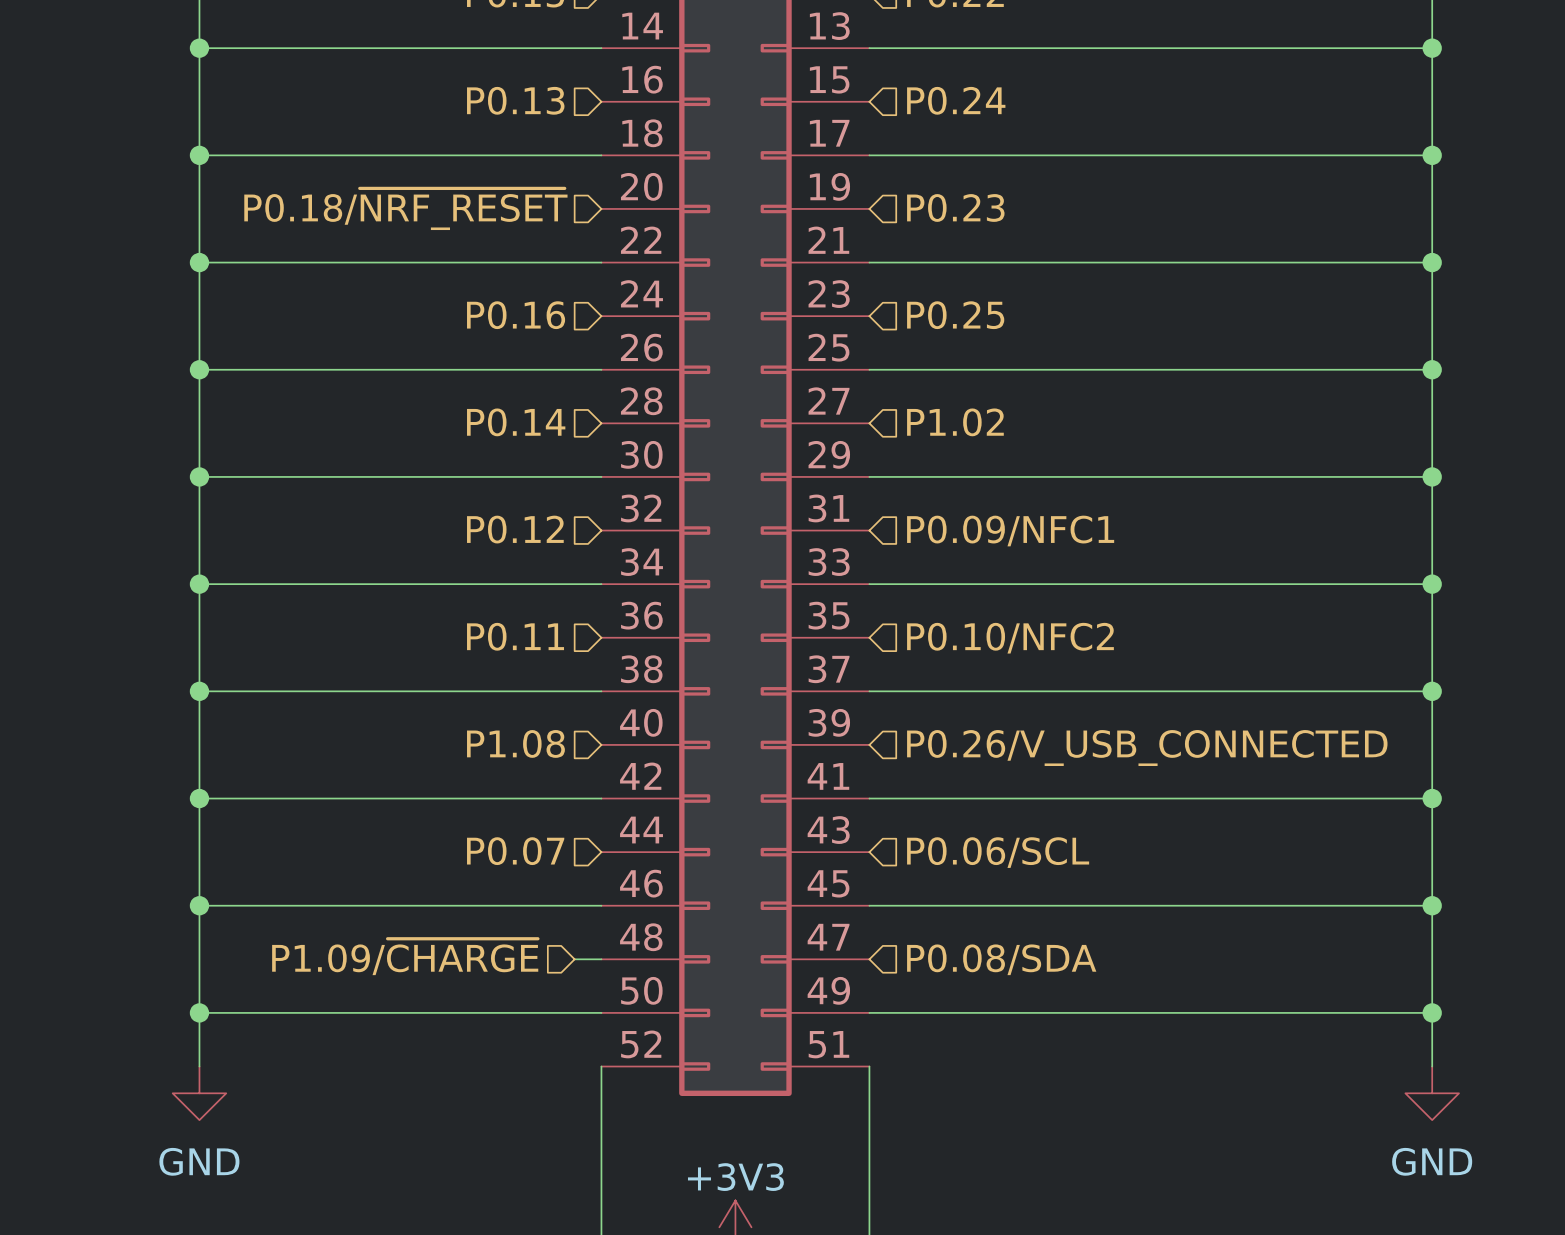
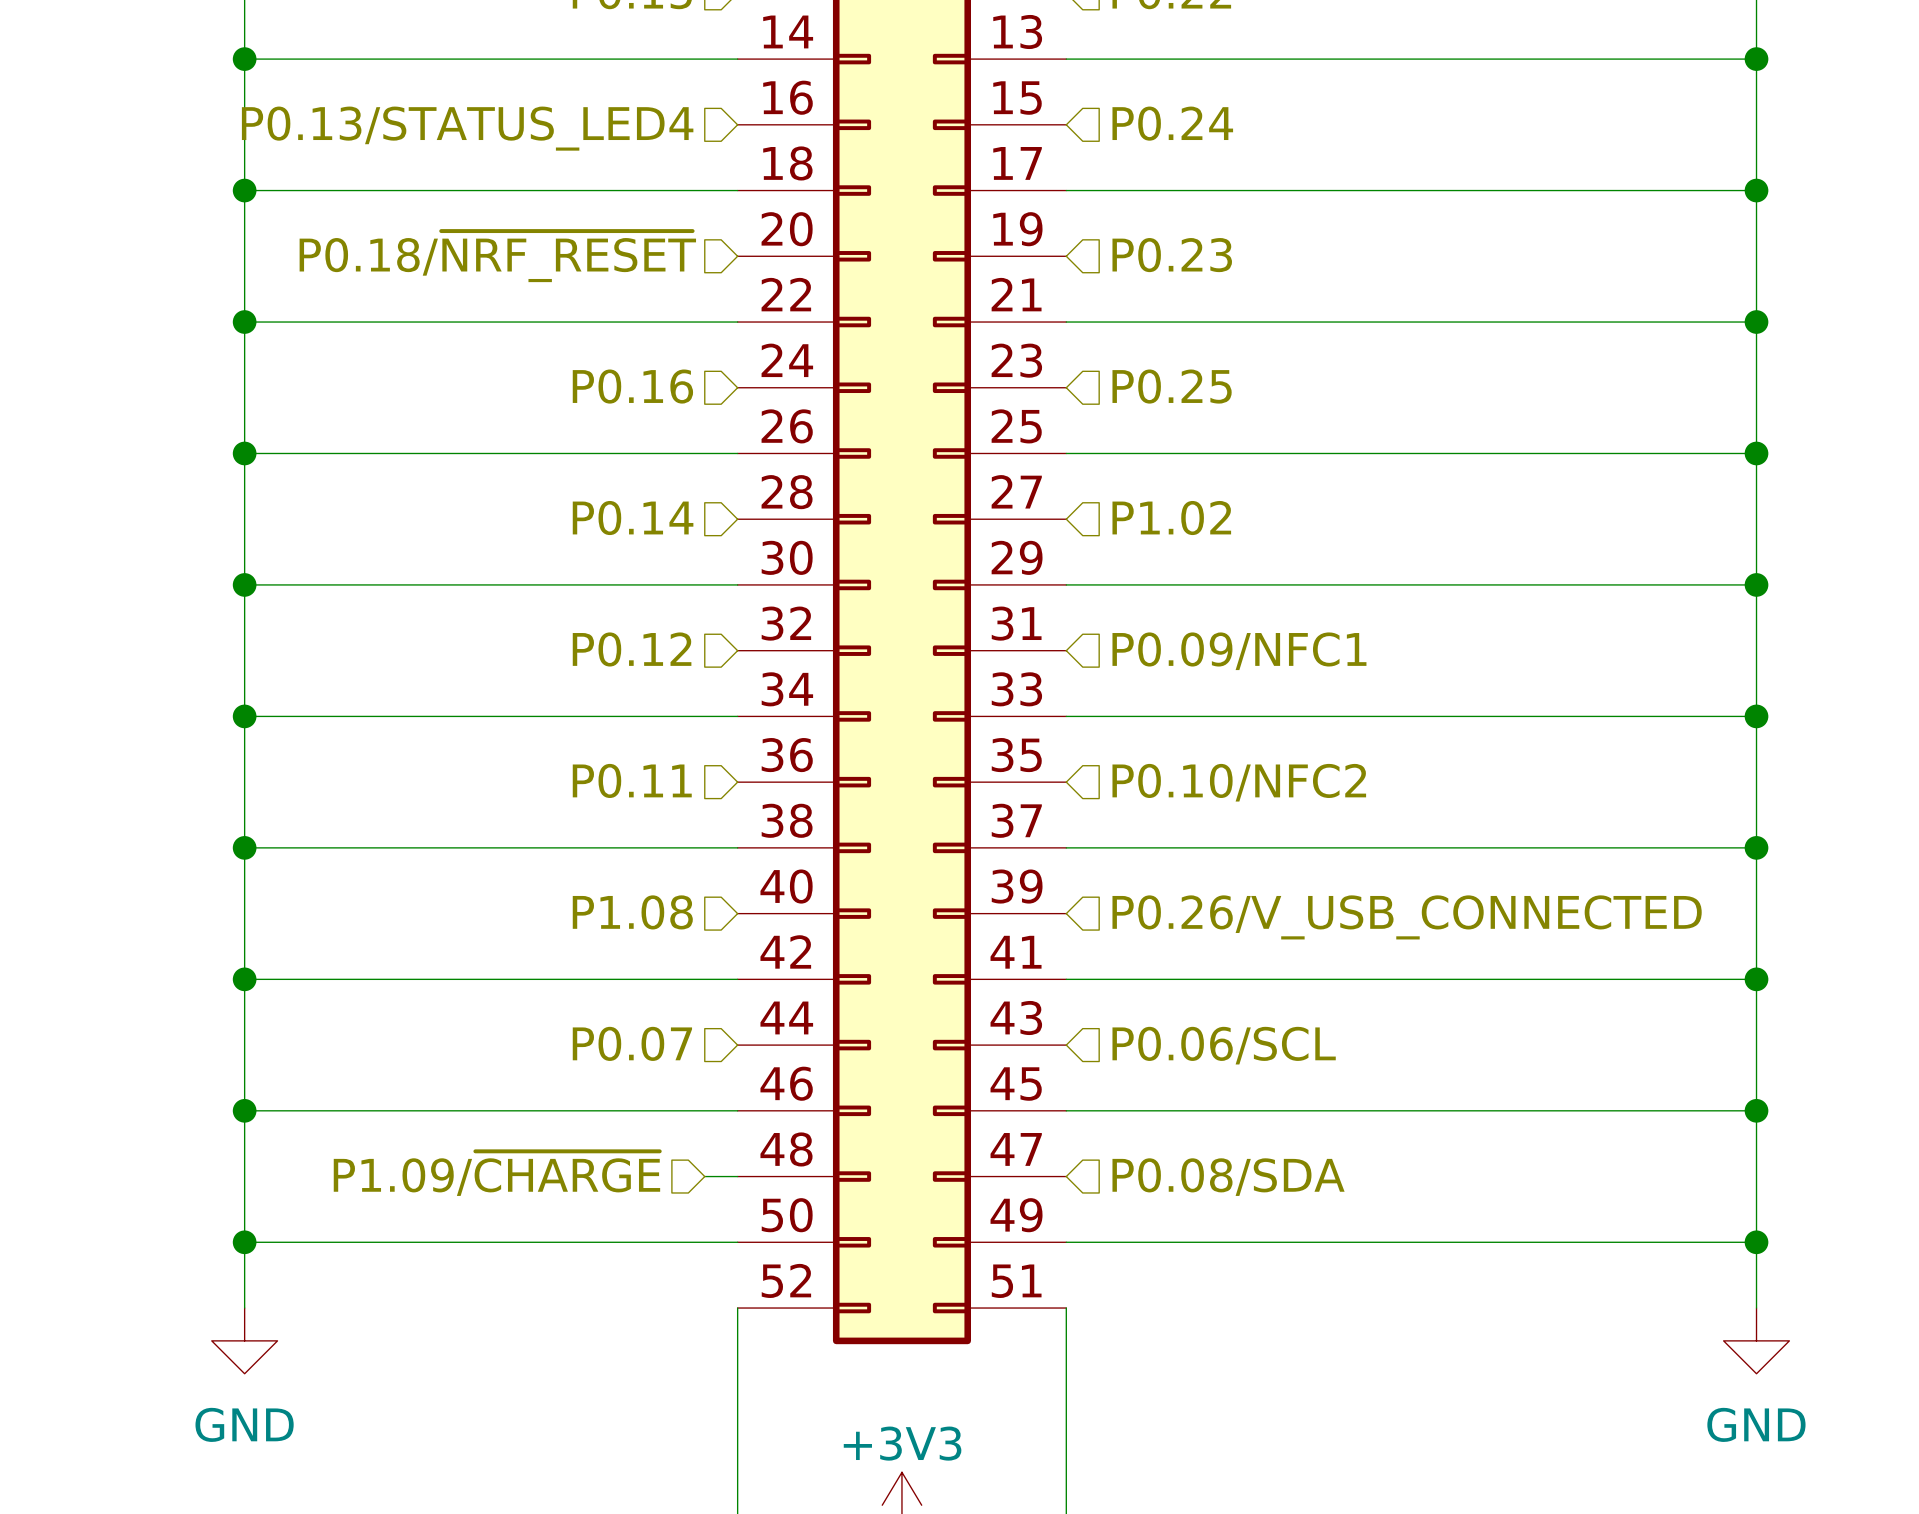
hierarchical label: P0.13 (515, 100) -> P0.13/STATUS_LED4 (467, 128)

